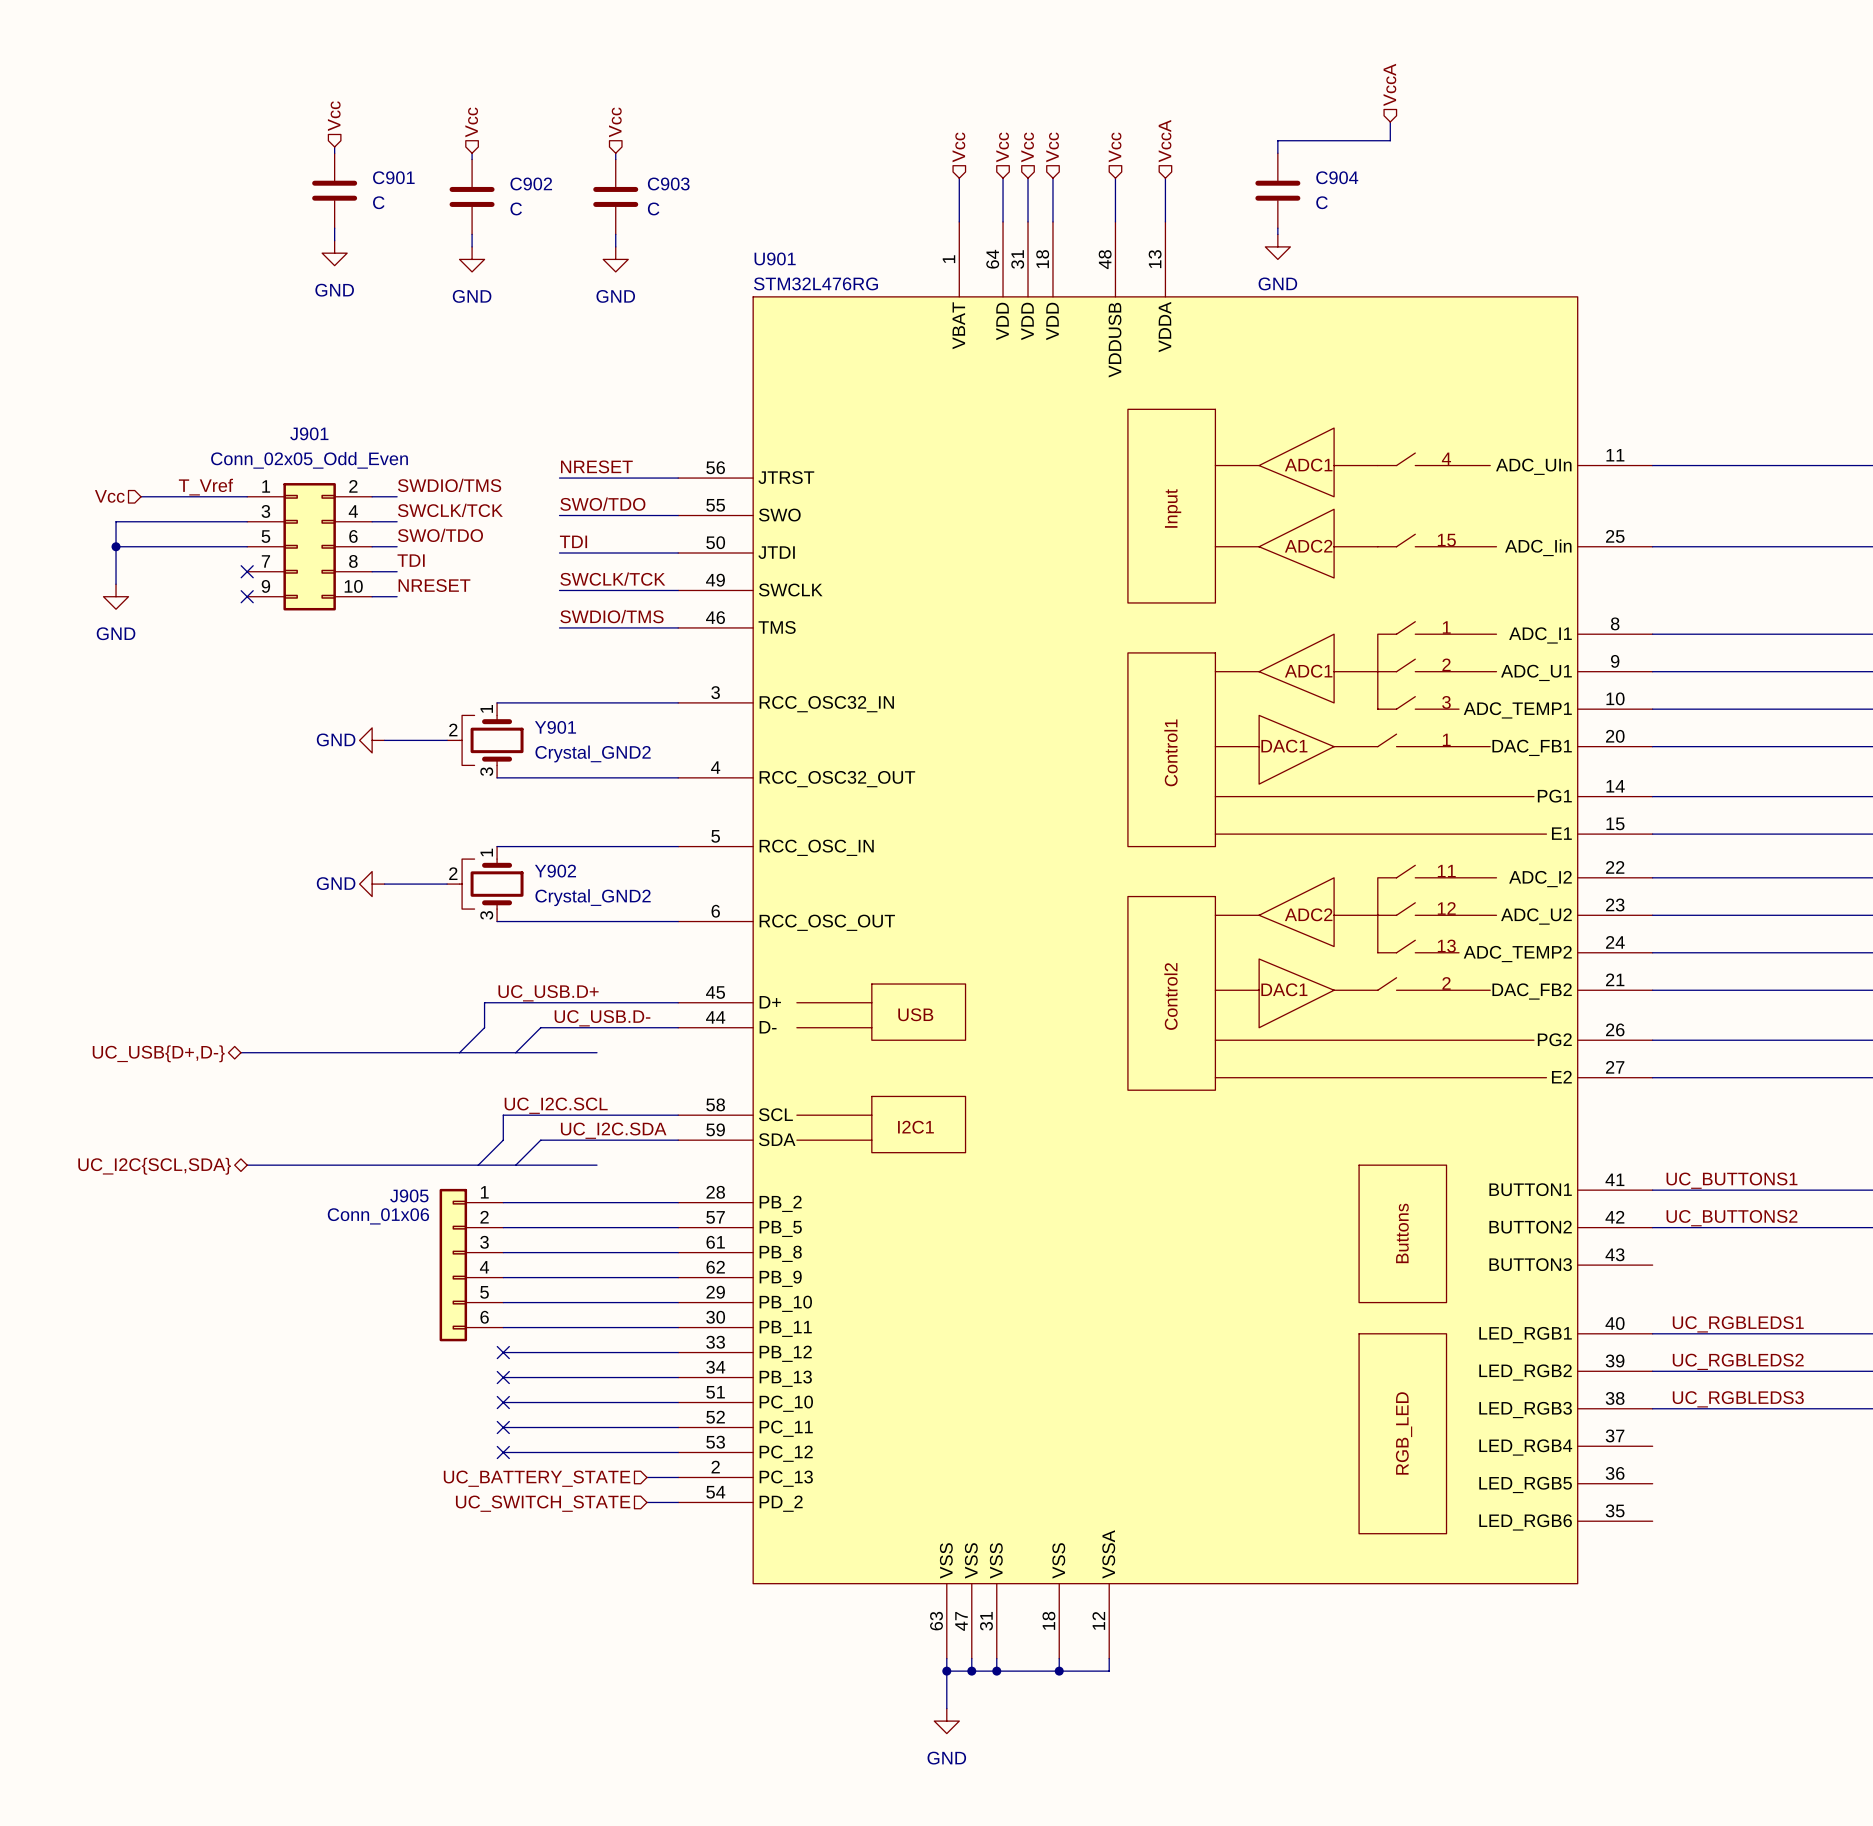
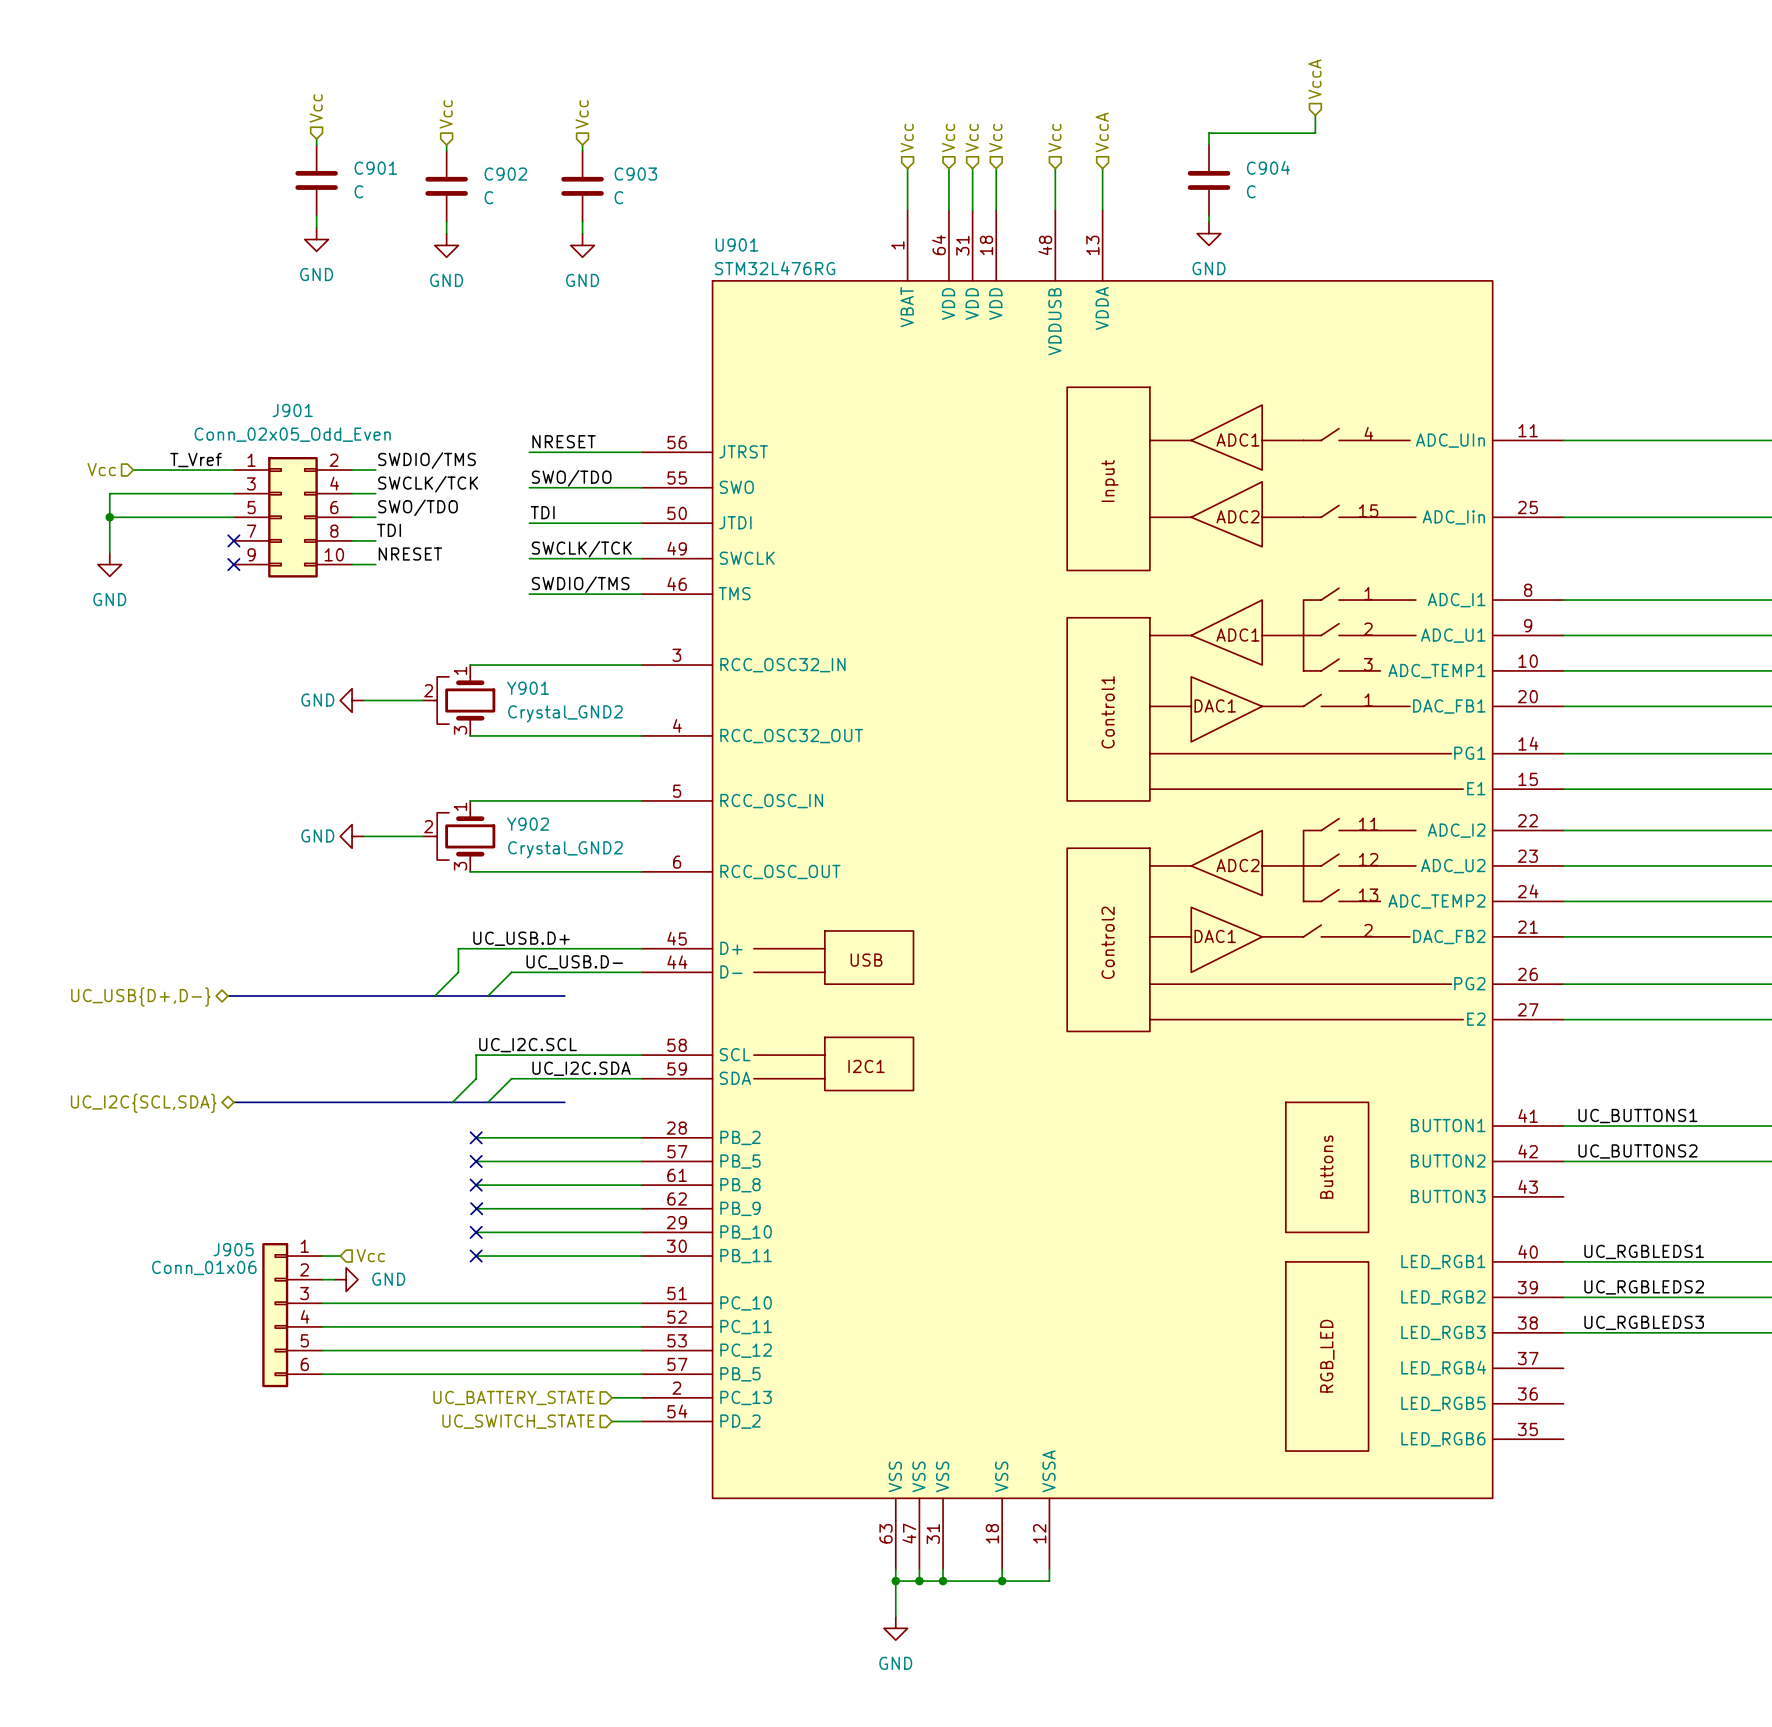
U901 symbol: [678, 221, 1653, 1659] -> [641, 209, 1564, 1570]
no-connect mark: none -> (476, 1137)
no-connect mark: none -> (476, 1161)
no-connect mark: none -> (476, 1185)
J905 position: (471, 1265) -> (292, 1315)
no-connect mark: none -> (476, 1208)
no-connect mark: none -> (476, 1232)
wire: none -> (322, 1256) (340, 1256)
hierarchical label: none -> Vcc (370, 1255)
no-connect mark: none -> (476, 1256)
wire: none -> (322, 1279) (334, 1279)
power symbol: none -> GND (346, 1279)
wire: (503, 1352) (678, 1352) -> none
no-connect mark: (503, 1352) -> none
wire: none -> (322, 1303) (476, 1303)
no-connect mark: (503, 1377) -> none
wire: none -> (322, 1326) (476, 1326)
no-connect mark: (503, 1402) -> none
wire: none -> (322, 1350) (476, 1350)
no-connect mark: (503, 1427) -> none
wire: none -> (322, 1374) (476, 1374)
no-connect mark: (503, 1452) -> none

